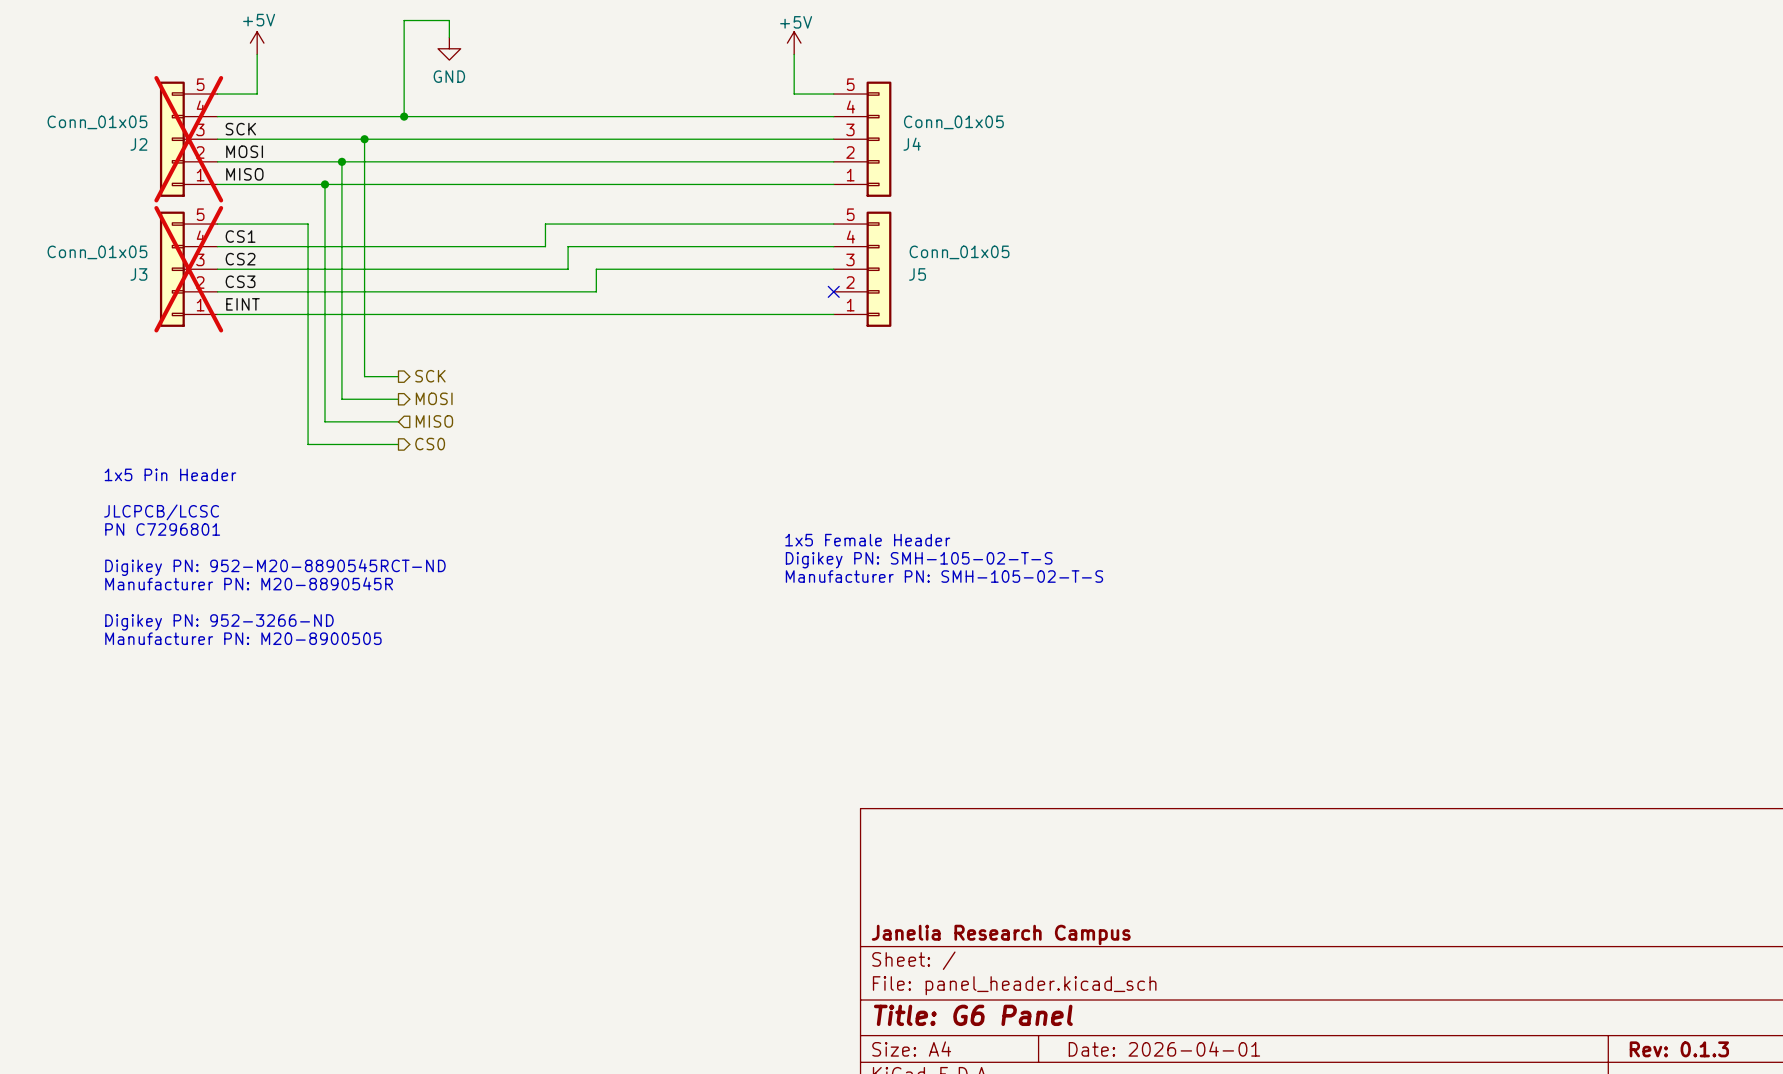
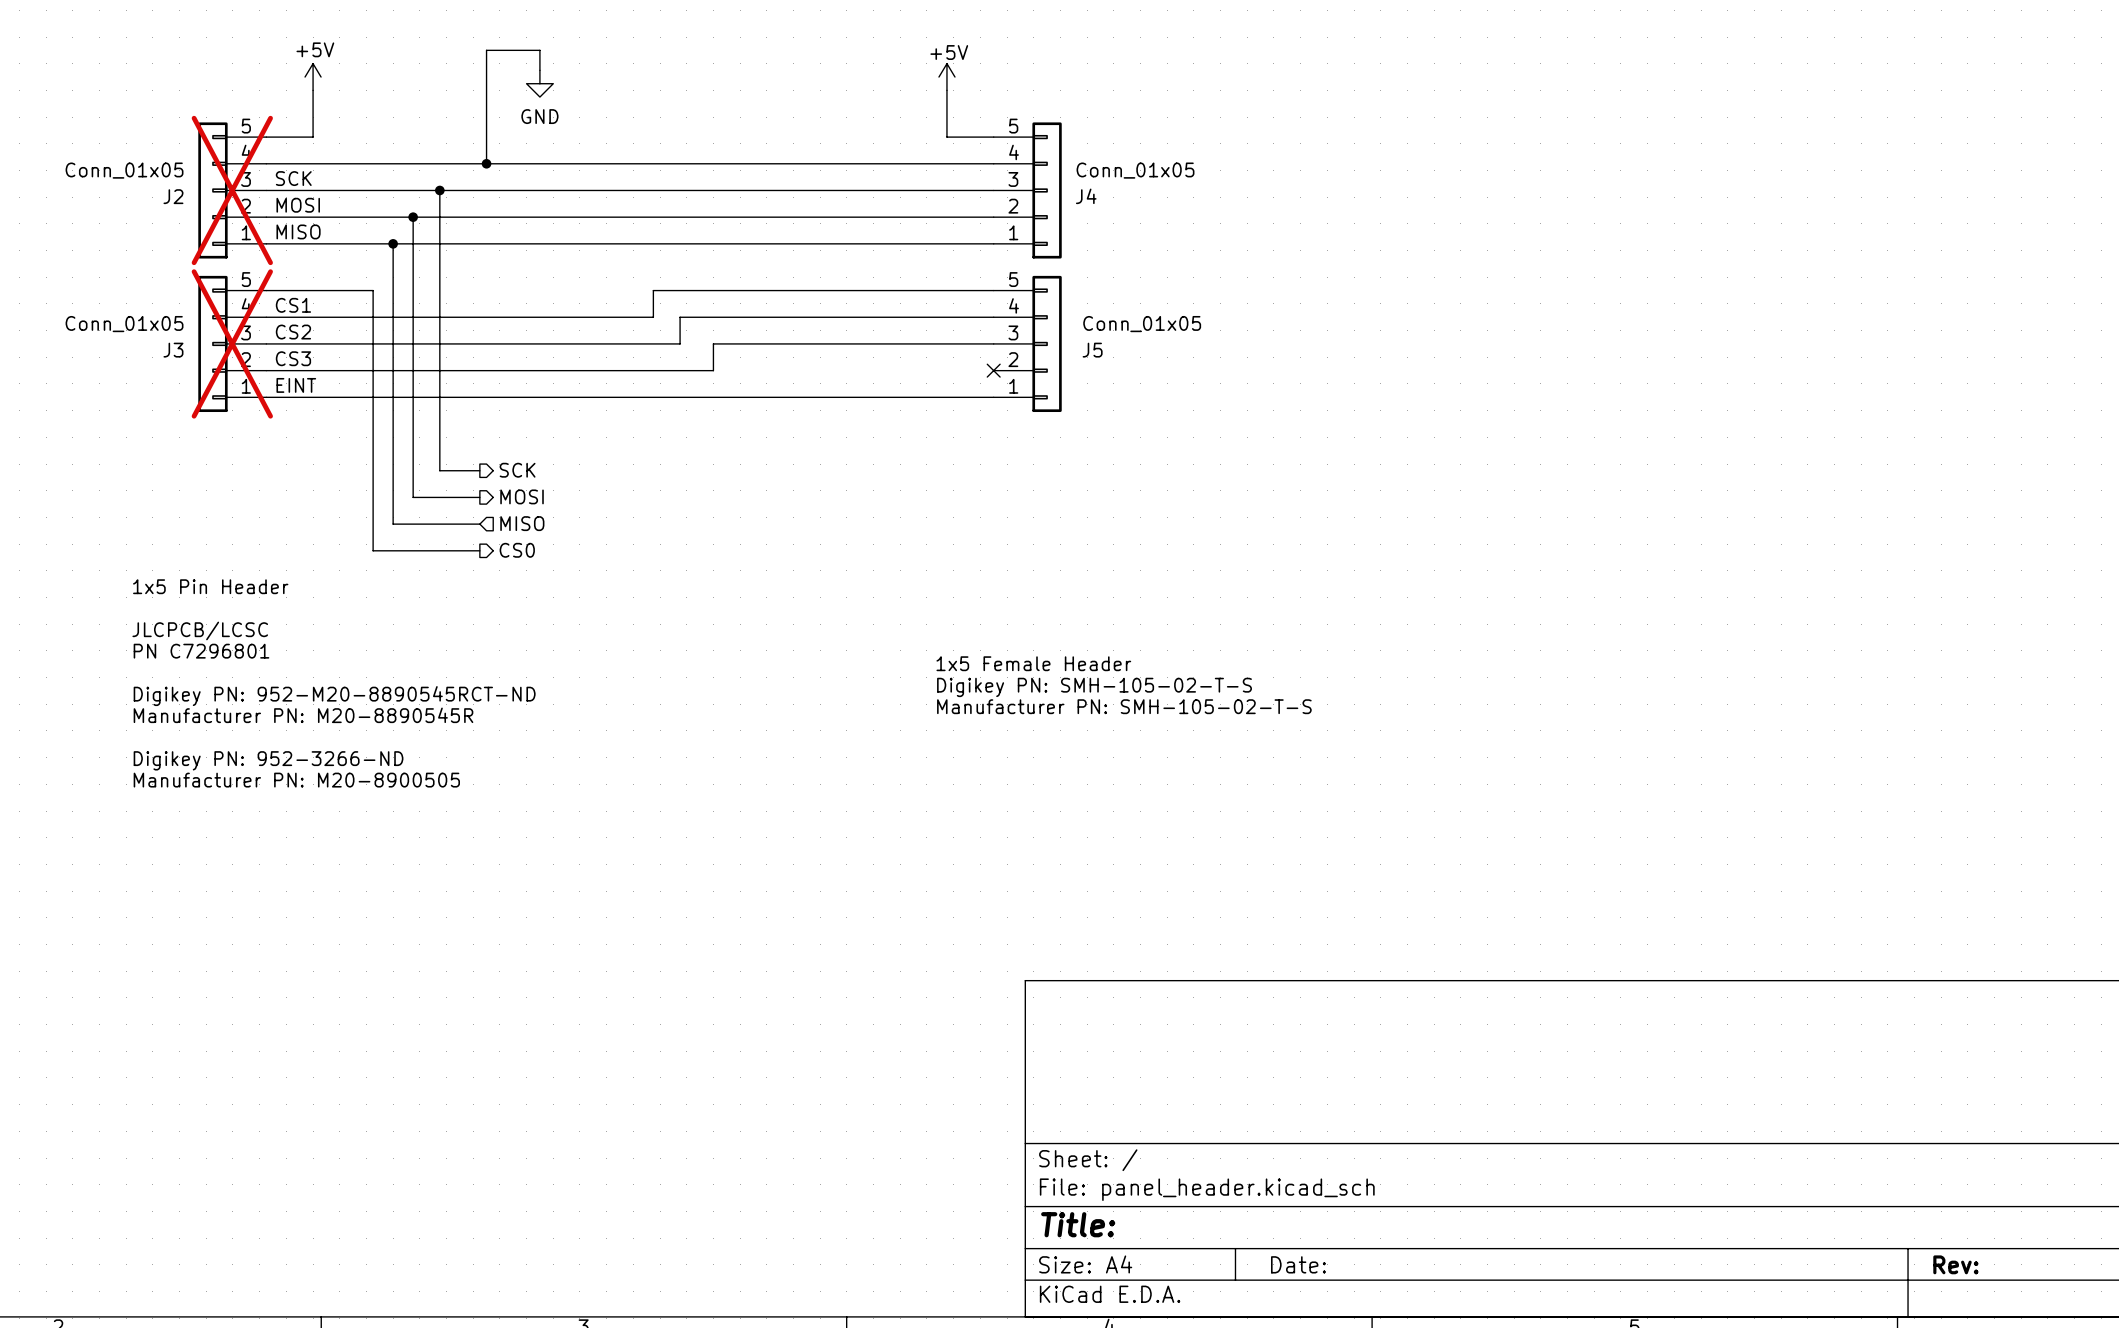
title block: Janelia Research Campus (1001, 934) -> none
title block: Title: G6 Panel (973, 1015) -> Title: (1078, 1224)
title block: Date: 2026-04-01 (1164, 1049) -> Date: (1298, 1264)
title block: Rev: 0.1.3 (1679, 1049) -> Rev: (1955, 1264)

